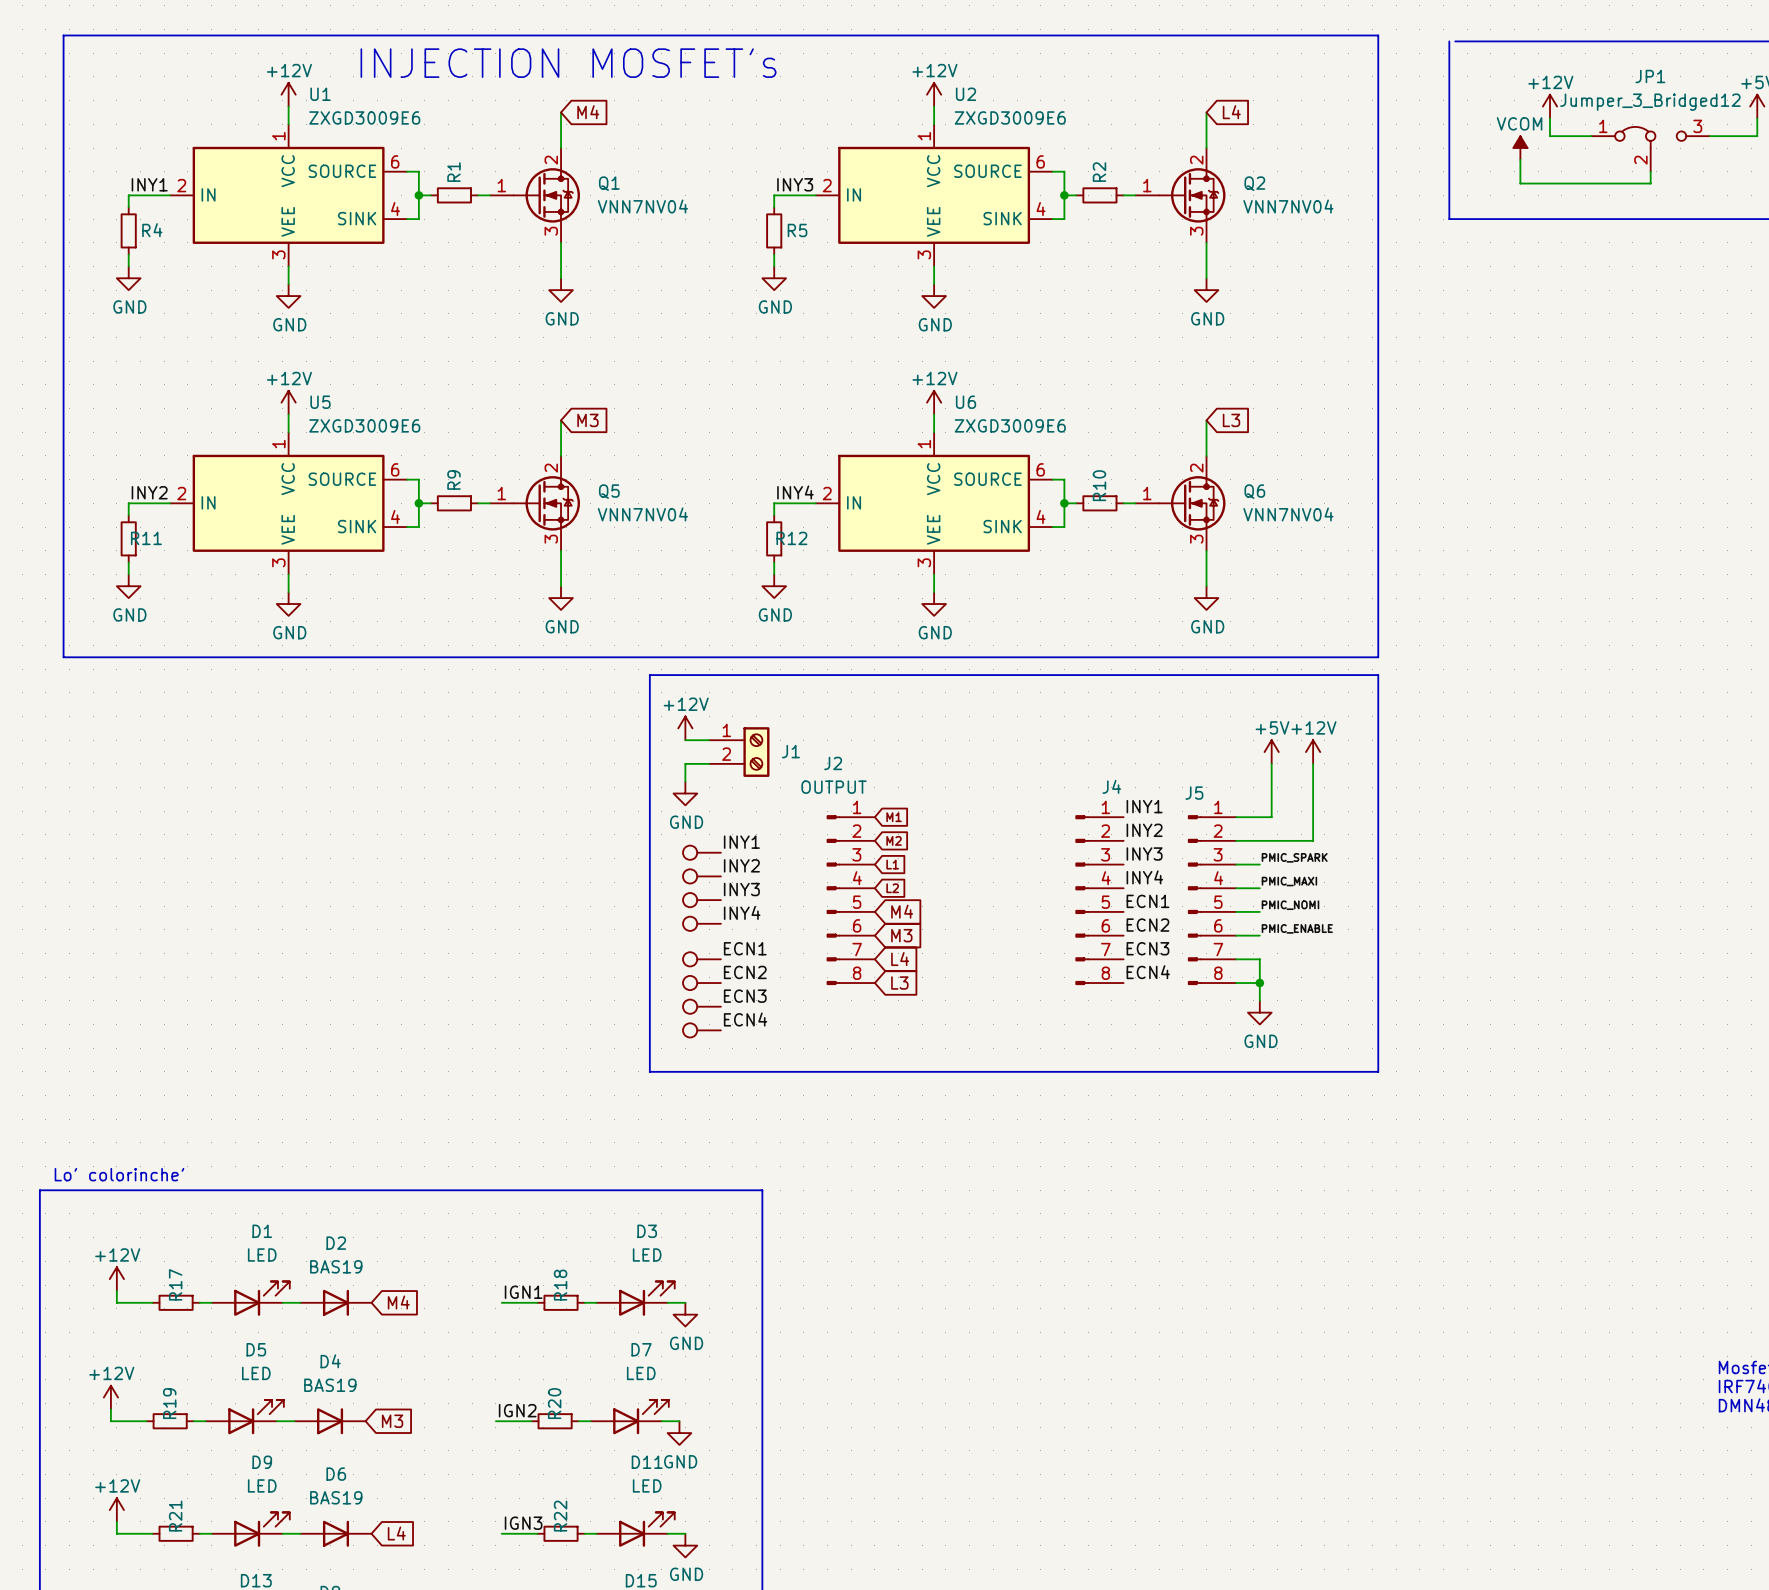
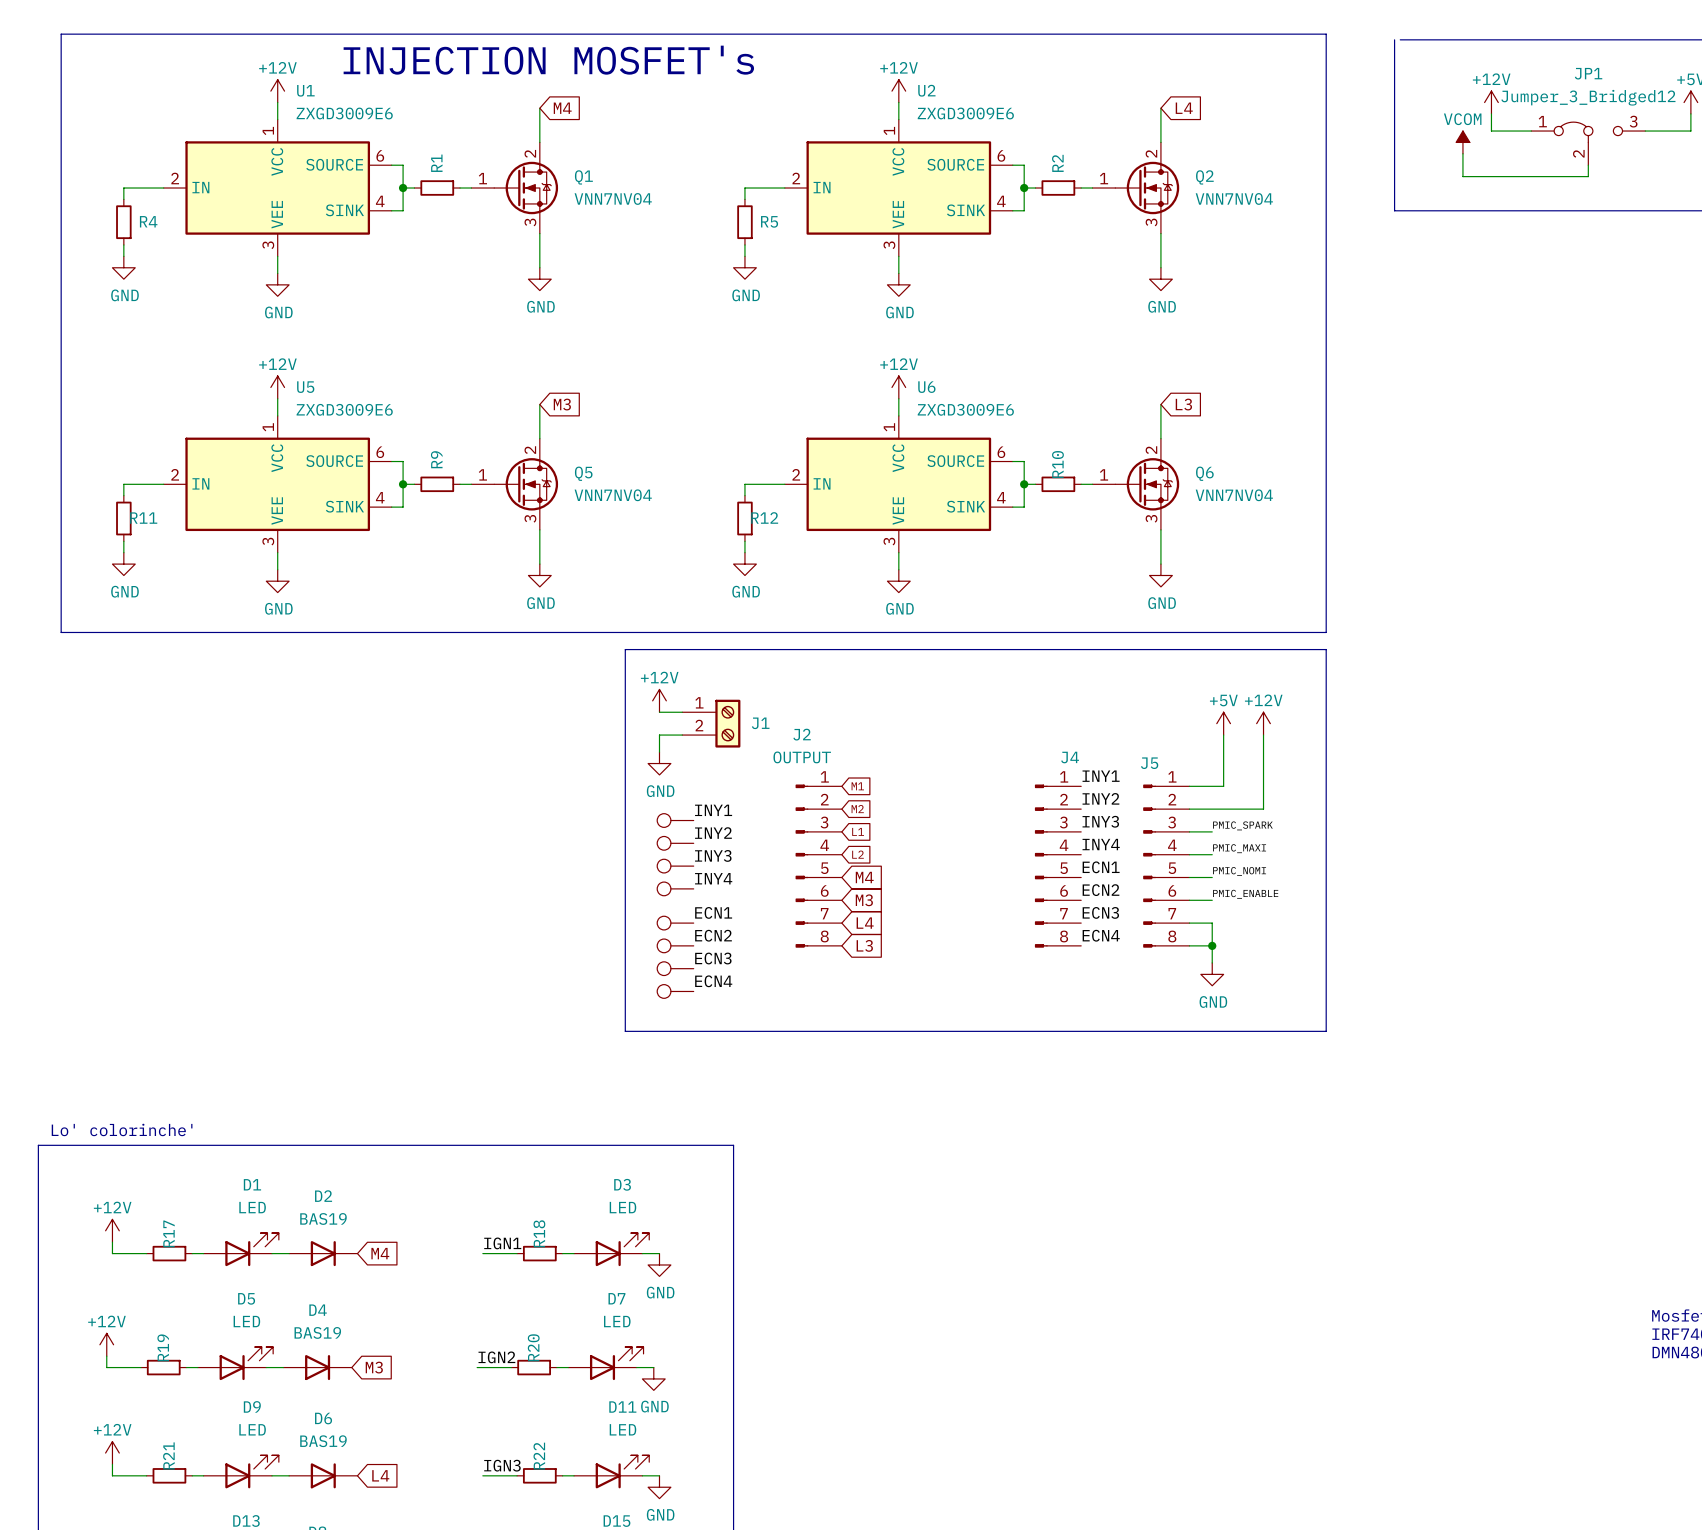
label: INY1 (149, 184) -> none
label: INY3 (795, 184) -> none
label: INY2 (149, 492) -> none
label: INY4 (795, 492) -> none

